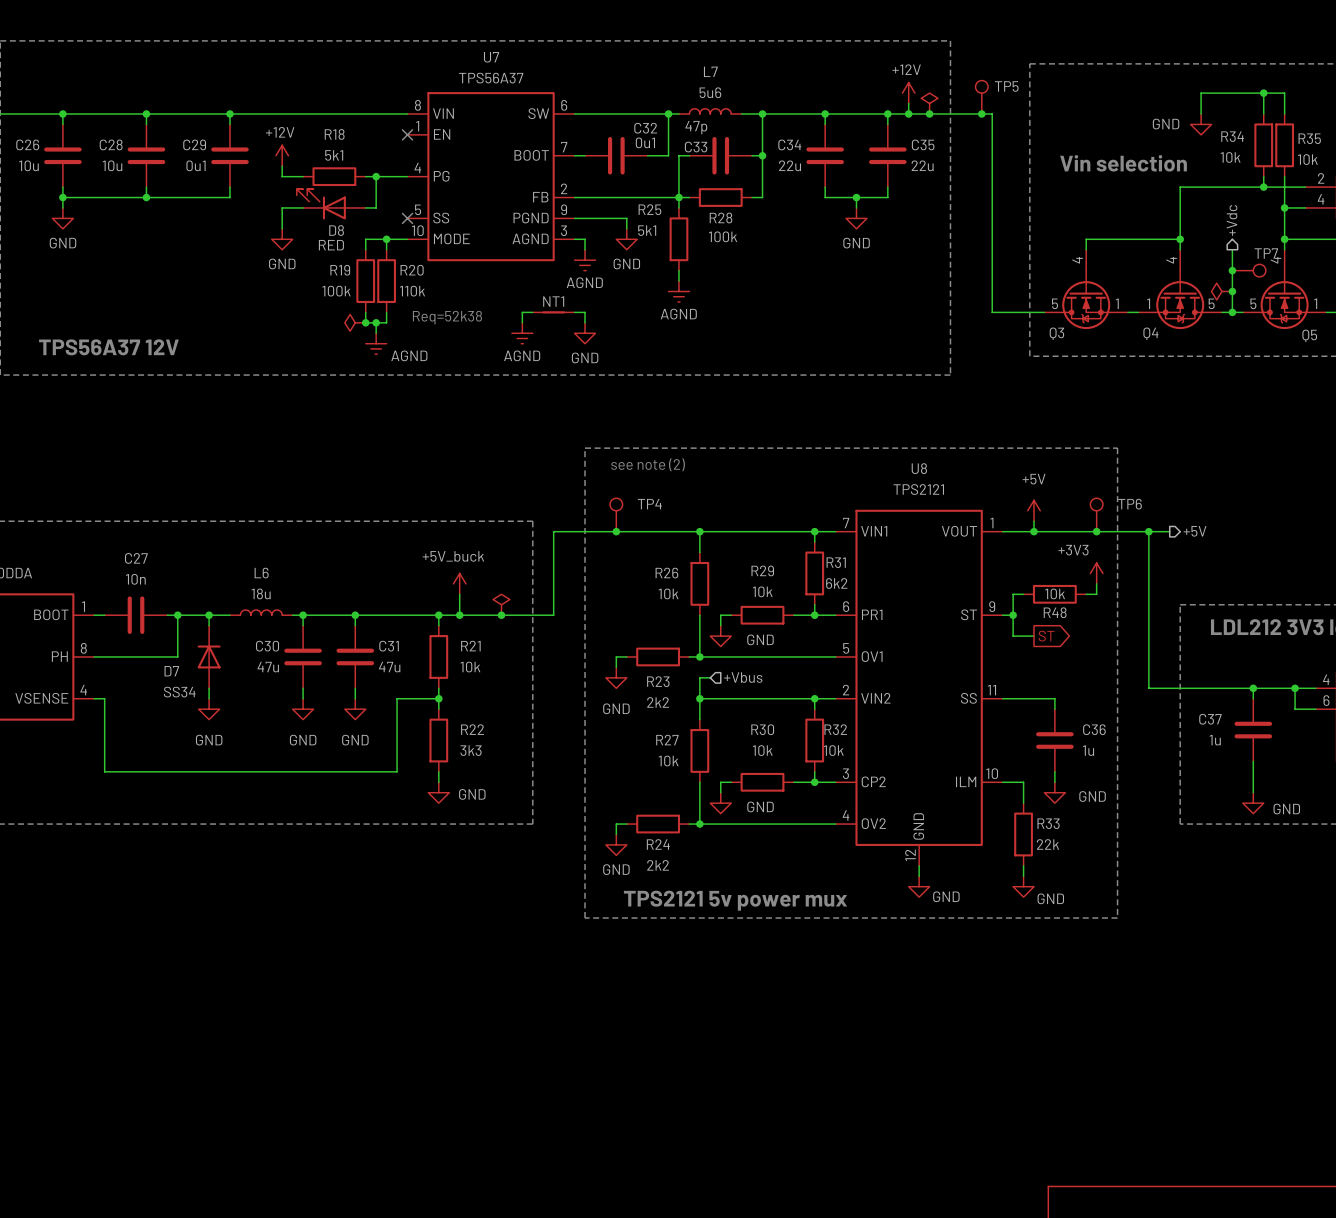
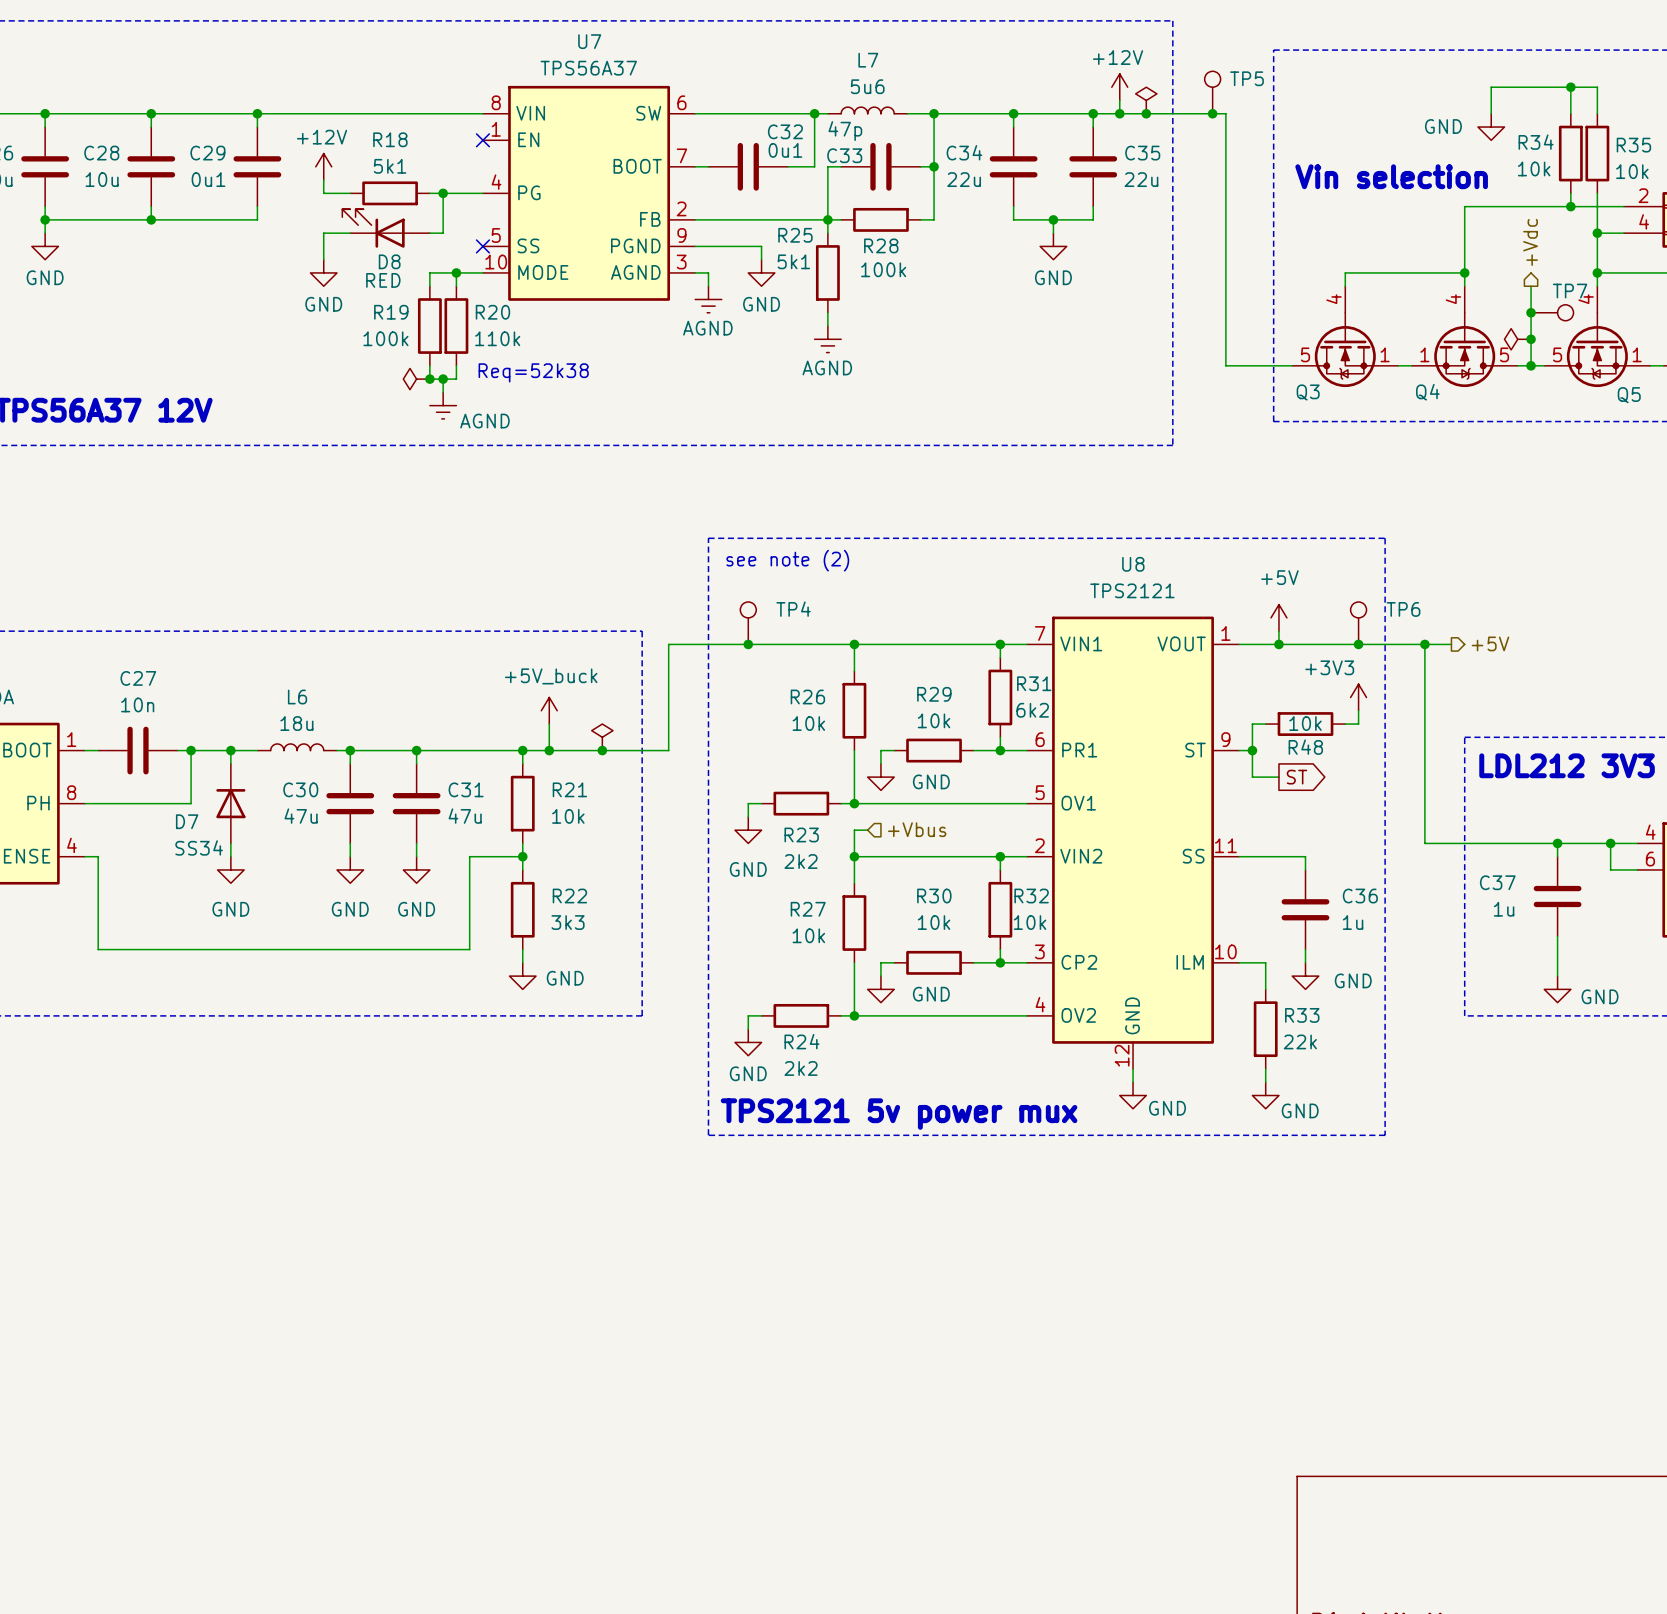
wire: (532, 312) (522, 312) (522, 322) -> none
NT1: (553, 312) -> none
wire: (574, 312) (585, 312) (585, 322) -> none
power symbol: AGND (522, 333) -> none
power symbol: GND (585, 333) -> none

